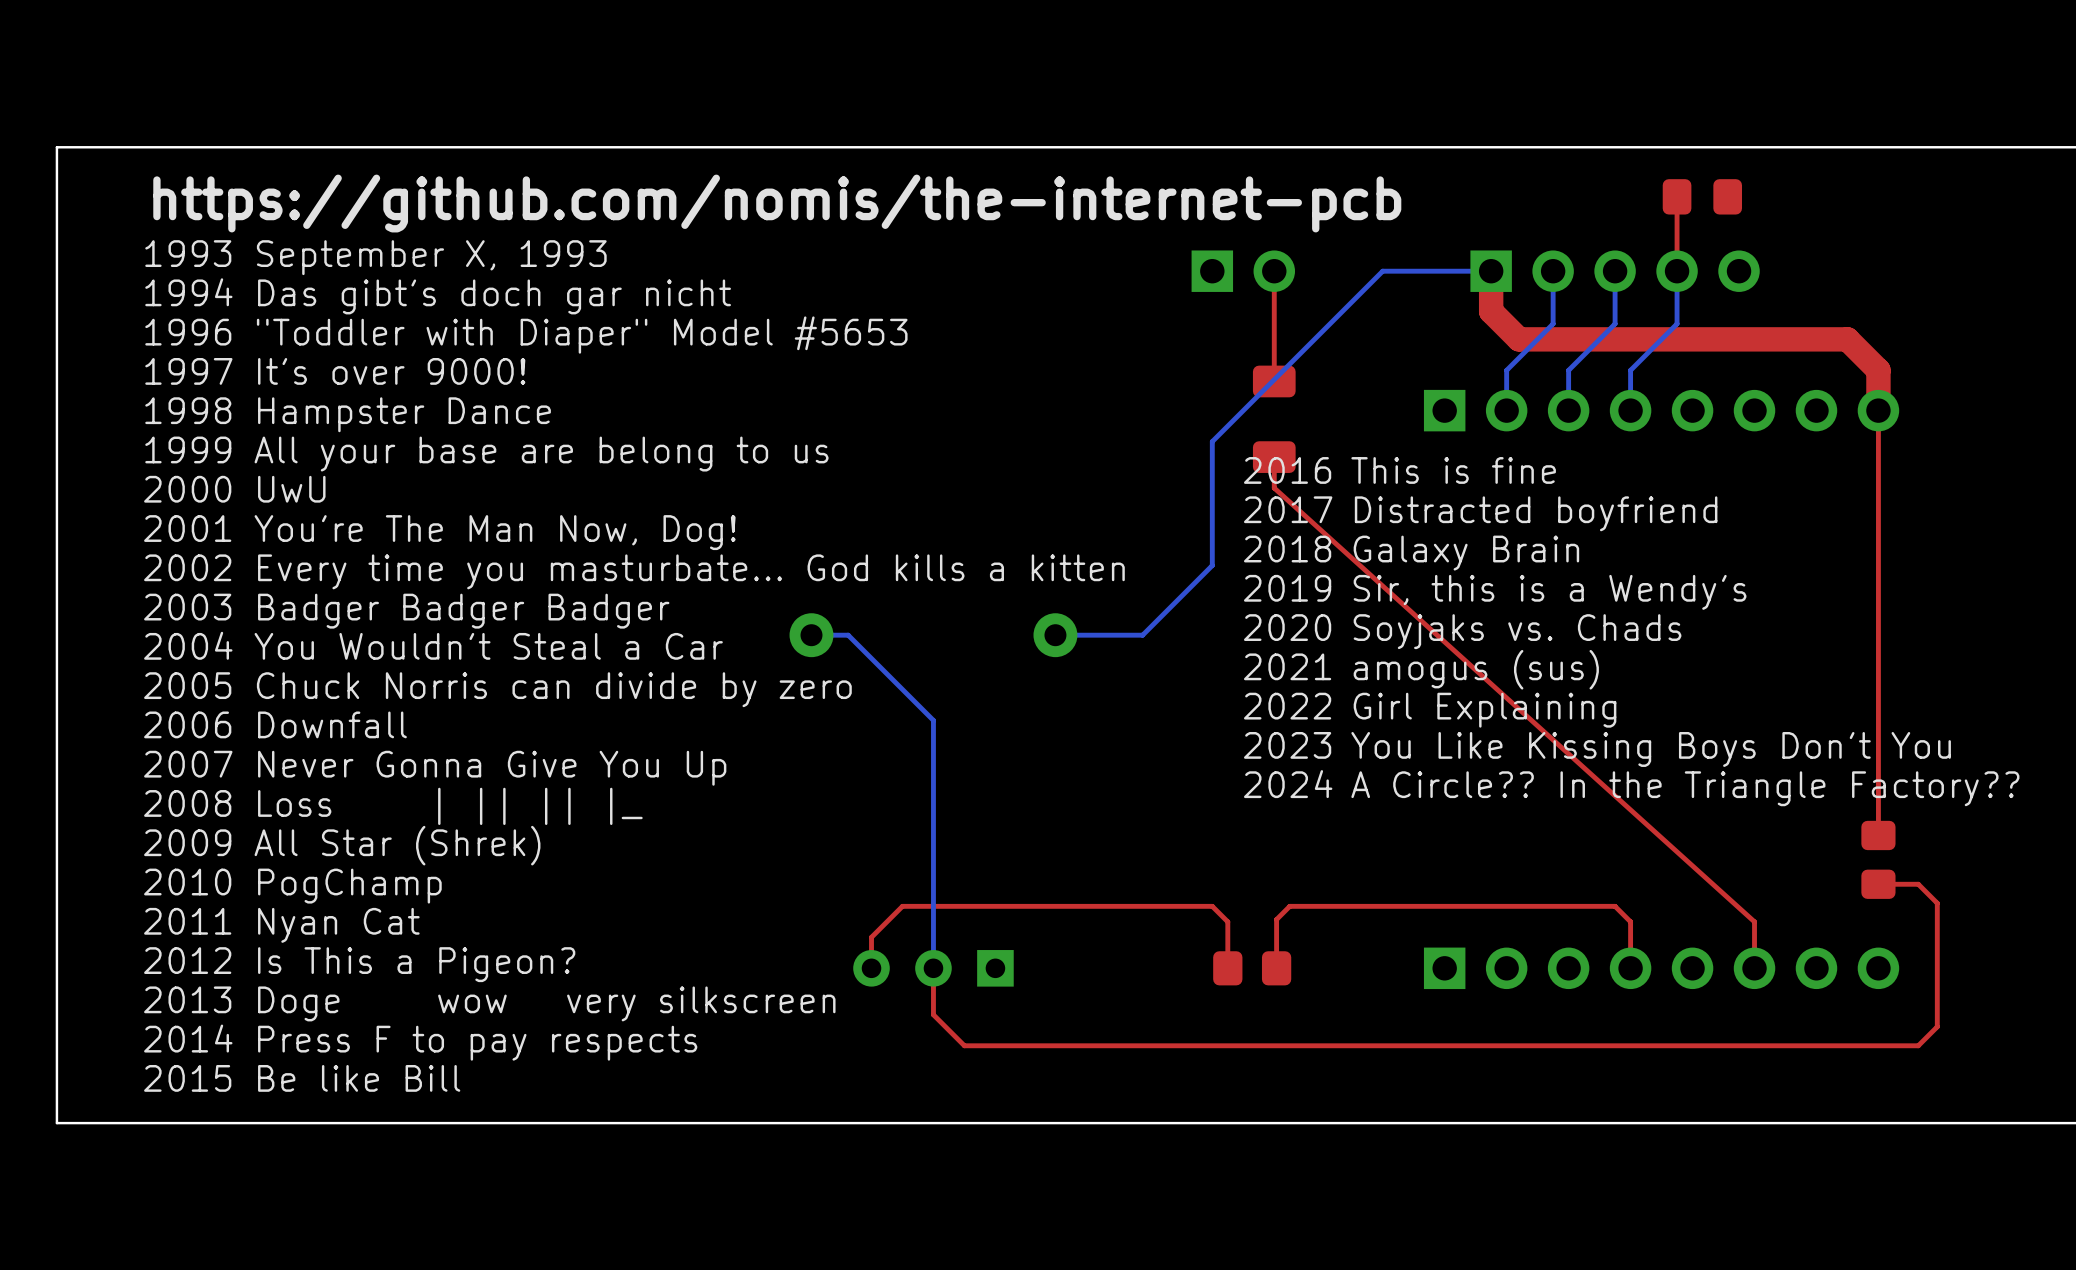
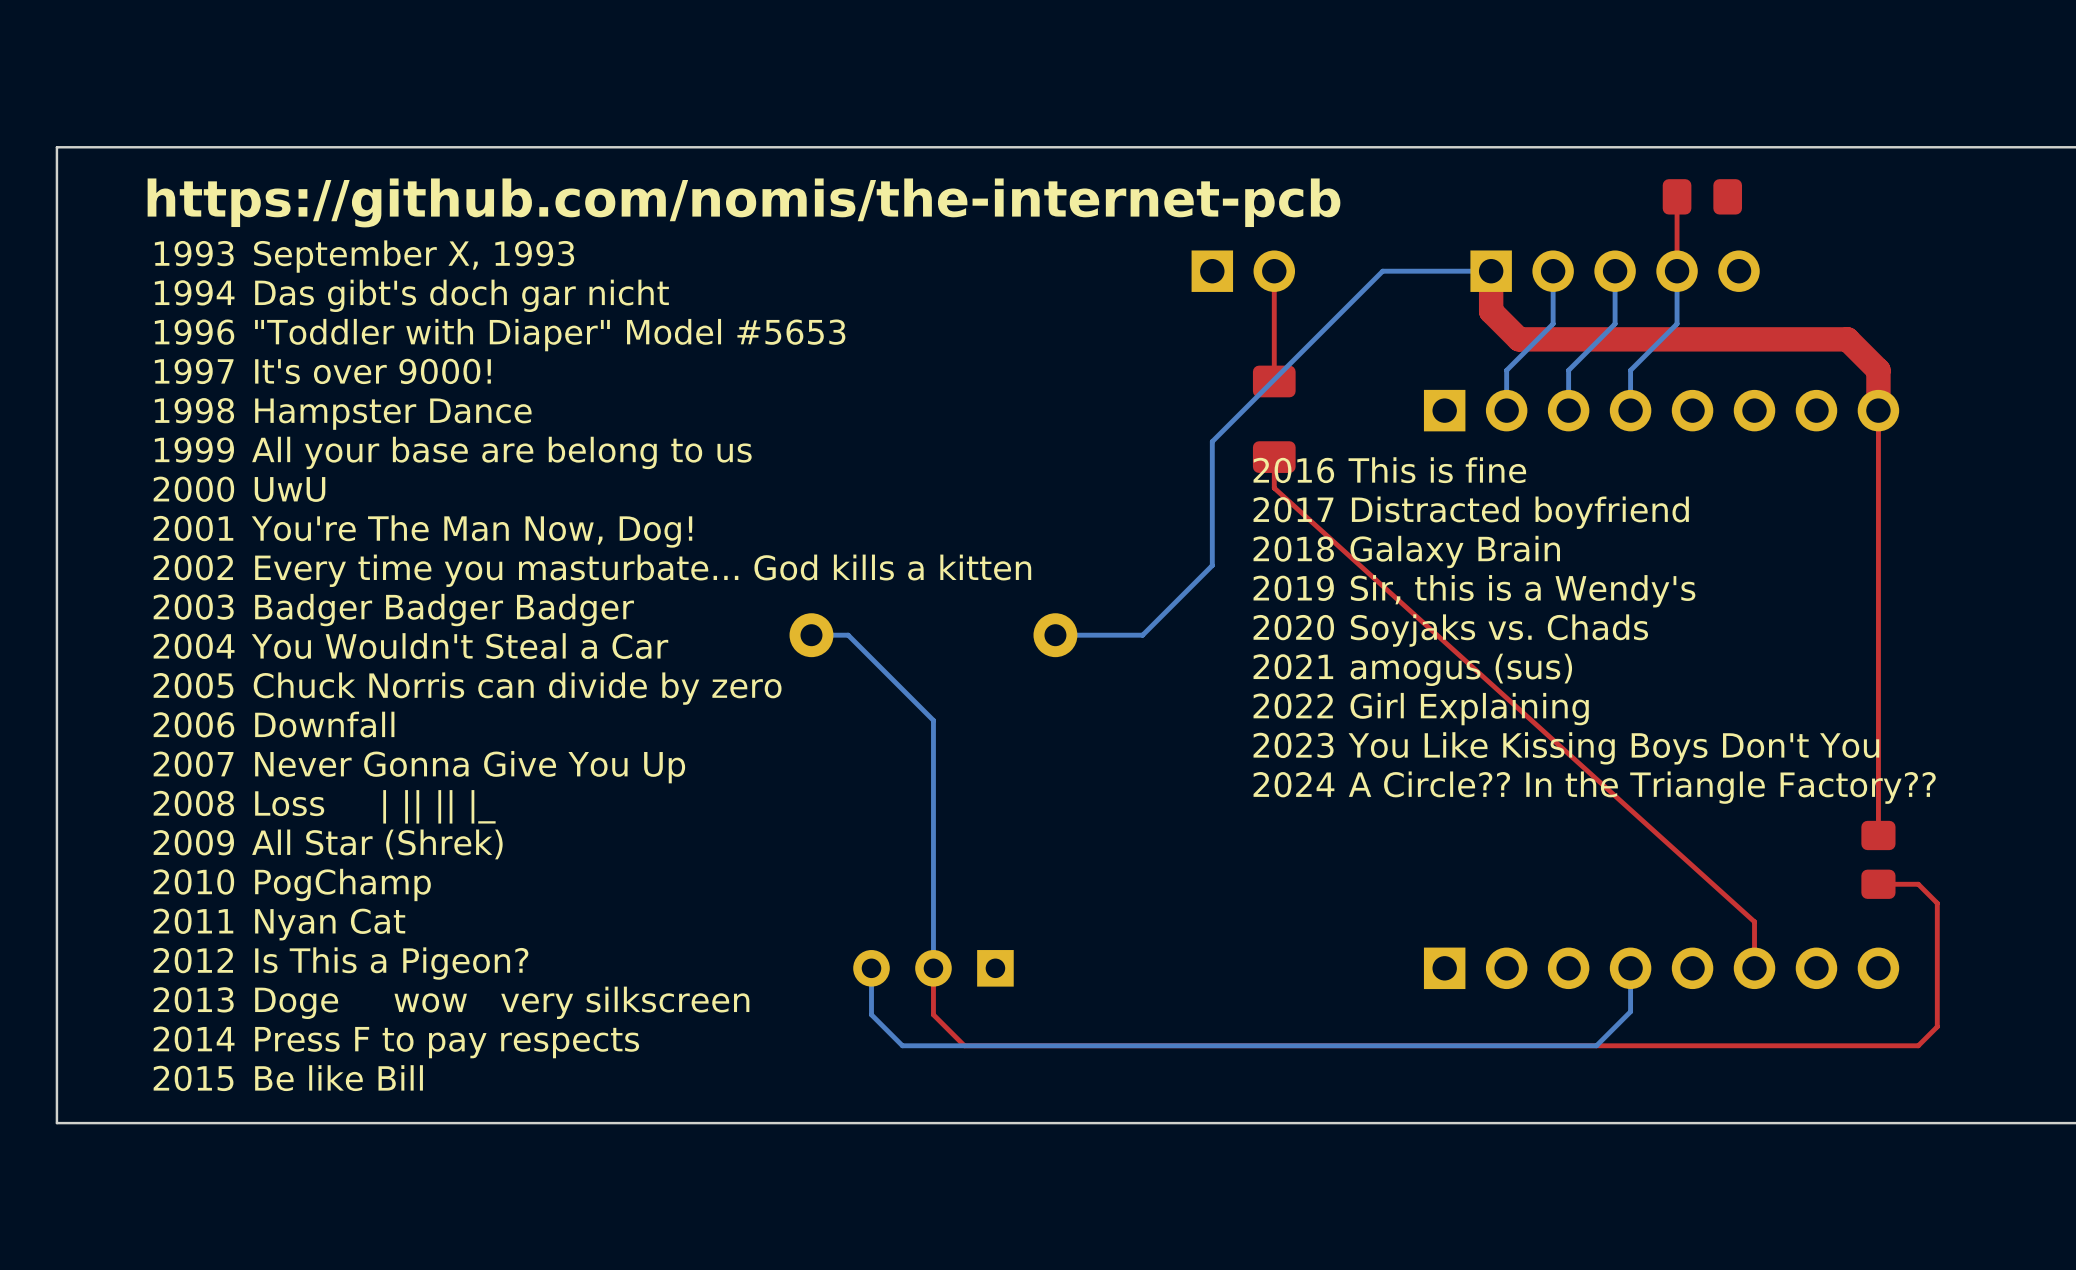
top track: (1227, 968) (1227, 921) (1212, 906) (902, 906) (871, 937) (871, 968) -> none
part: (1252, 968) -> none
top track: (1630, 968) (1630, 921) (1615, 906) (1289, 906) (1276, 919) (1276, 968) -> none
bottom track: none -> (1630, 968) (1630, 1011) (1596, 1045) (902, 1045) (871, 1014) (871, 968)

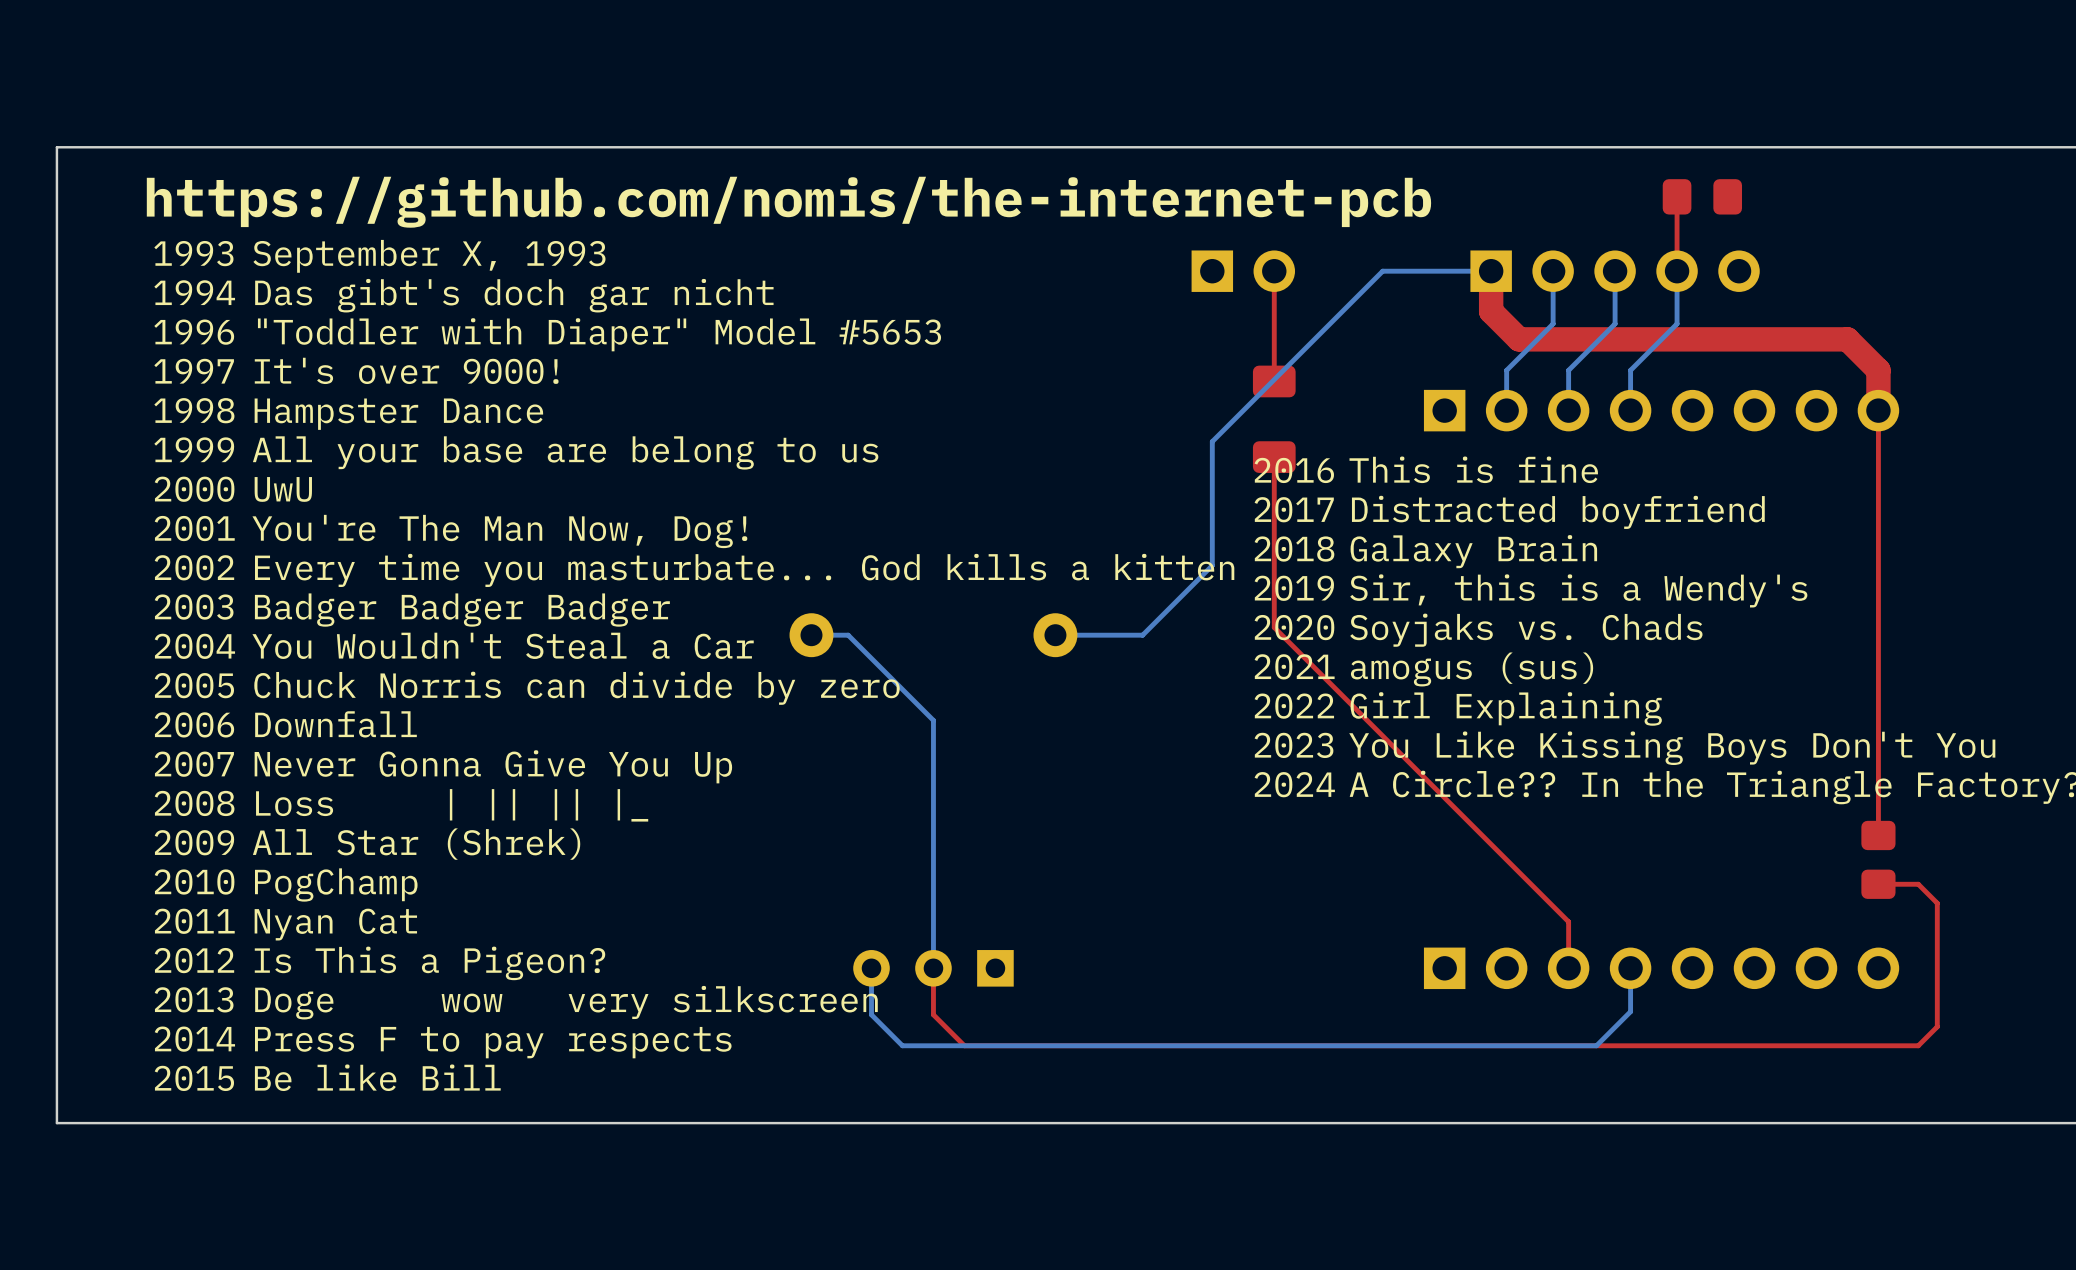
top track: (1274, 488) (1754, 921) (1754, 968) -> (1274, 488) (1274, 627) (1568, 921) (1568, 968)

